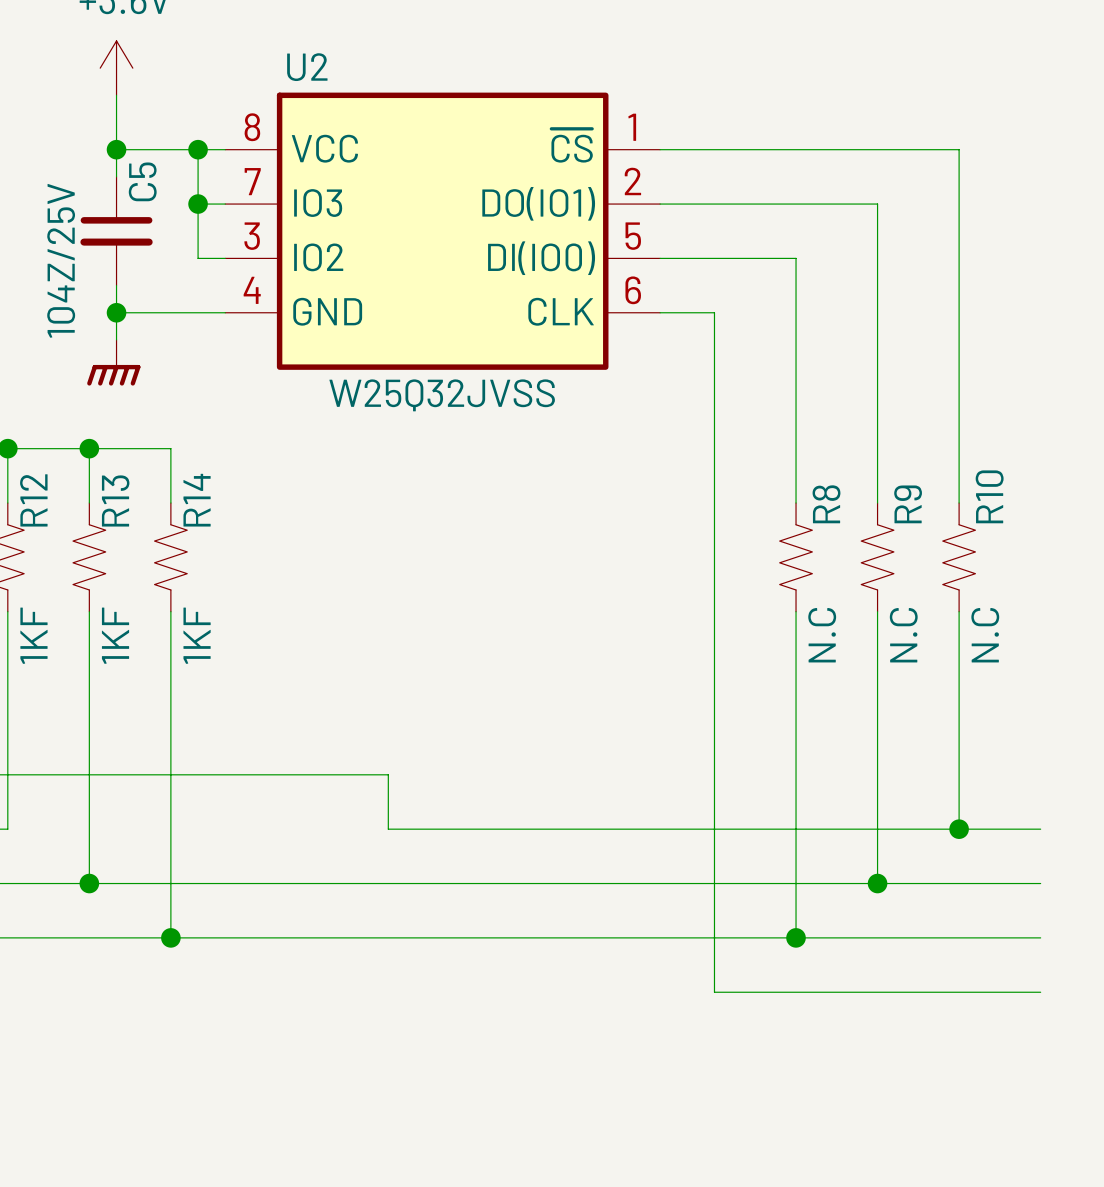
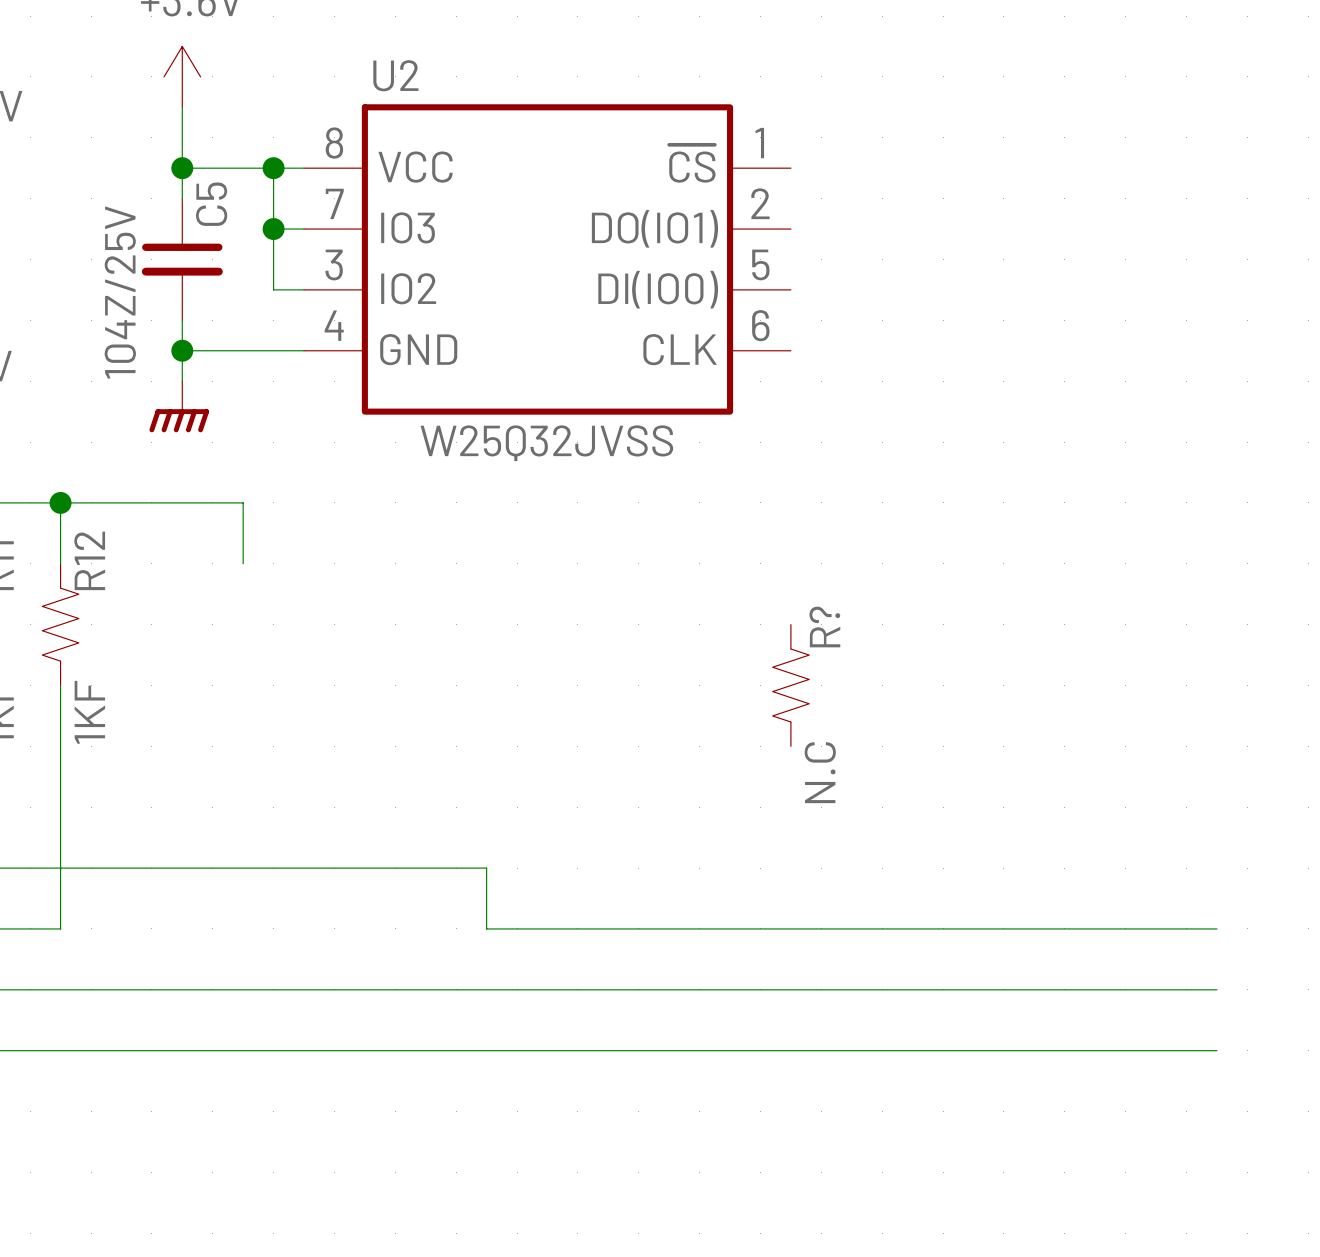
wire: (660, 149) (959, 149) (959, 503) -> none
wire: (660, 204) (877, 204) (877, 503) -> none
wire: (660, 258) (796, 258) (796, 503) -> none
wire: (660, 312) (714, 312) (714, 992) (1040, 992) -> none
wire: (89, 448) (89, 503) -> none
junction: (89, 448) -> none
R13: (89, 557) -> none
R14: (170, 557) -> none
R8: (796, 557) -> none
R9: (877, 557) -> none
R10: (959, 557) -> none
wire: (89, 611) (89, 883) -> none
wire: (170, 611) (170, 937) -> none
R?: none -> (790, 685)
wire: (796, 611) (796, 937) -> none
wire: (877, 611) (877, 883) -> none
wire: (959, 611) (959, 829) -> none
junction: (959, 829) -> none
junction: (89, 883) -> none
junction: (877, 883) -> none
junction: (170, 937) -> none
junction: (796, 937) -> none

